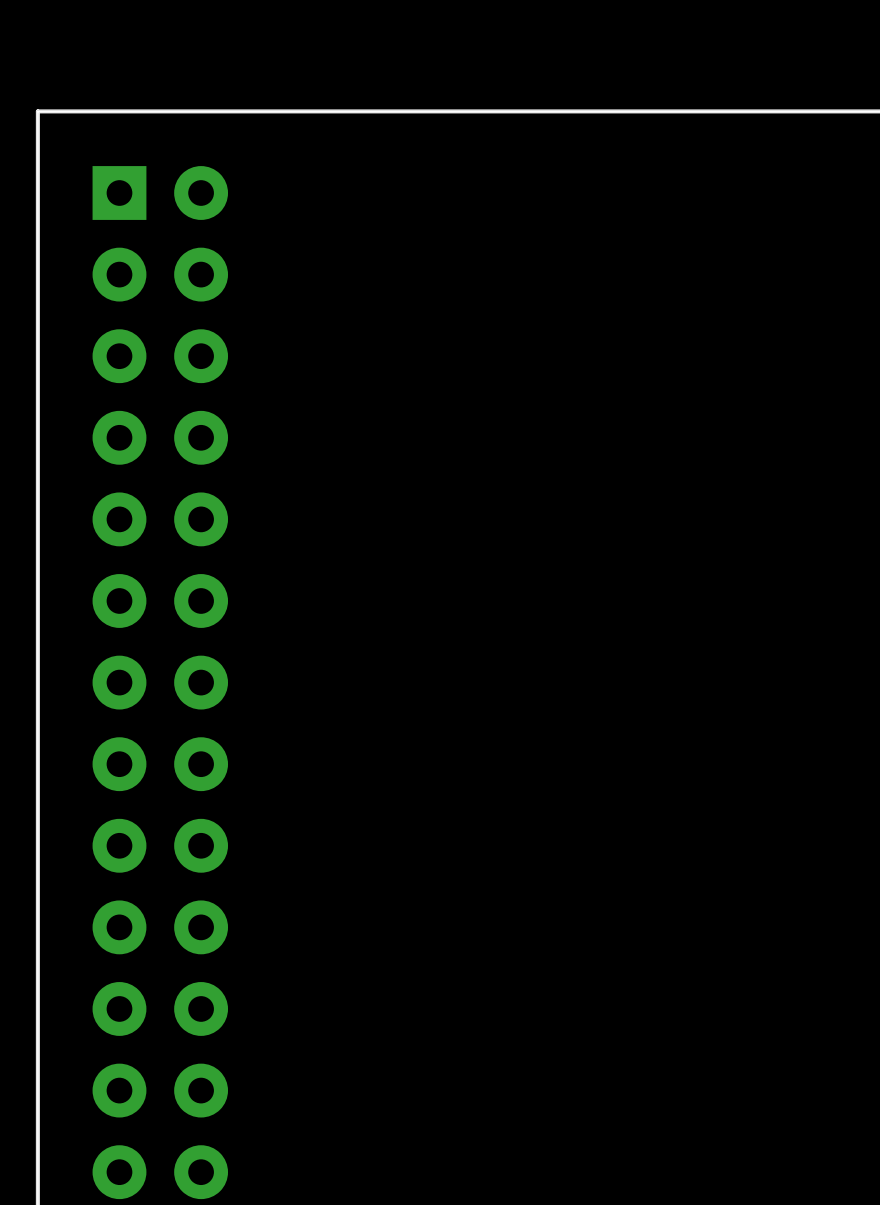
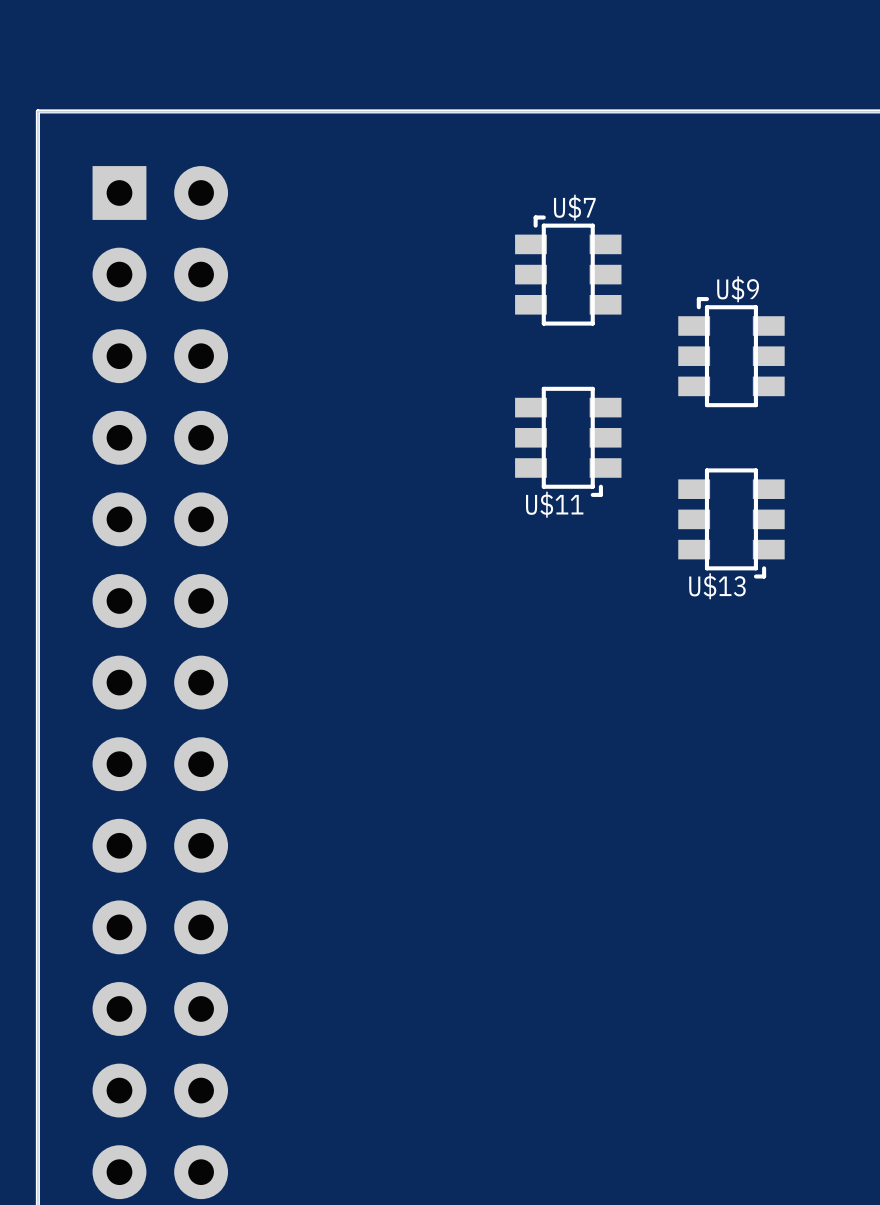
U$7: none -> (568, 270)
U$9: none -> (731, 352)
U$11: none -> (568, 441)
U$13: none -> (731, 523)

